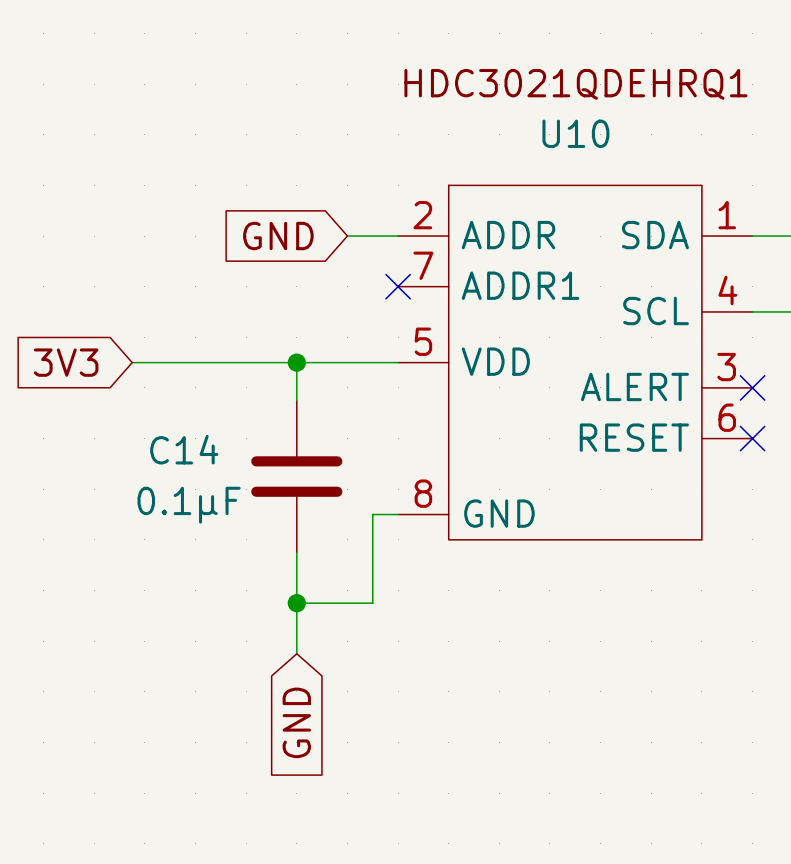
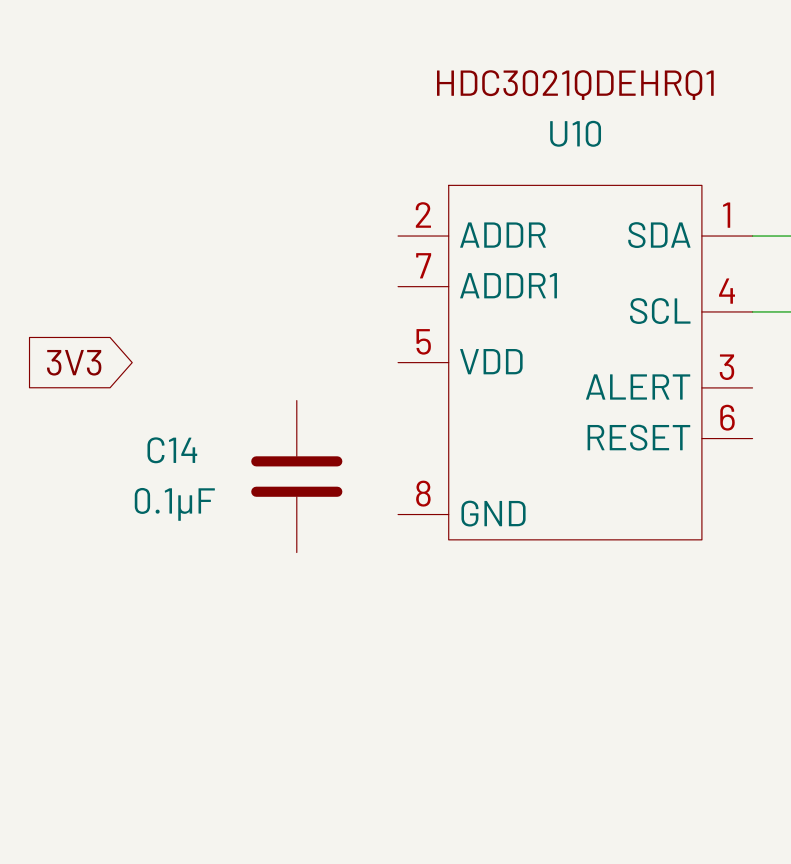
global label: GND (278, 236) -> none
wire: (347, 236) (398, 236) -> none
no-connect mark: (398, 286) -> none
wire: (132, 362) (398, 362) -> none
wire: (296, 362) (296, 400) -> none
junction: (296, 362) -> none
no-connect mark: (752, 387) -> none
no-connect mark: (752, 438) -> none
wire: (398, 514) (372, 514) (372, 603) (296, 603) -> none
wire: (296, 552) (296, 653) -> none
junction: (296, 603) -> none
global label: GND (296, 722) -> none

